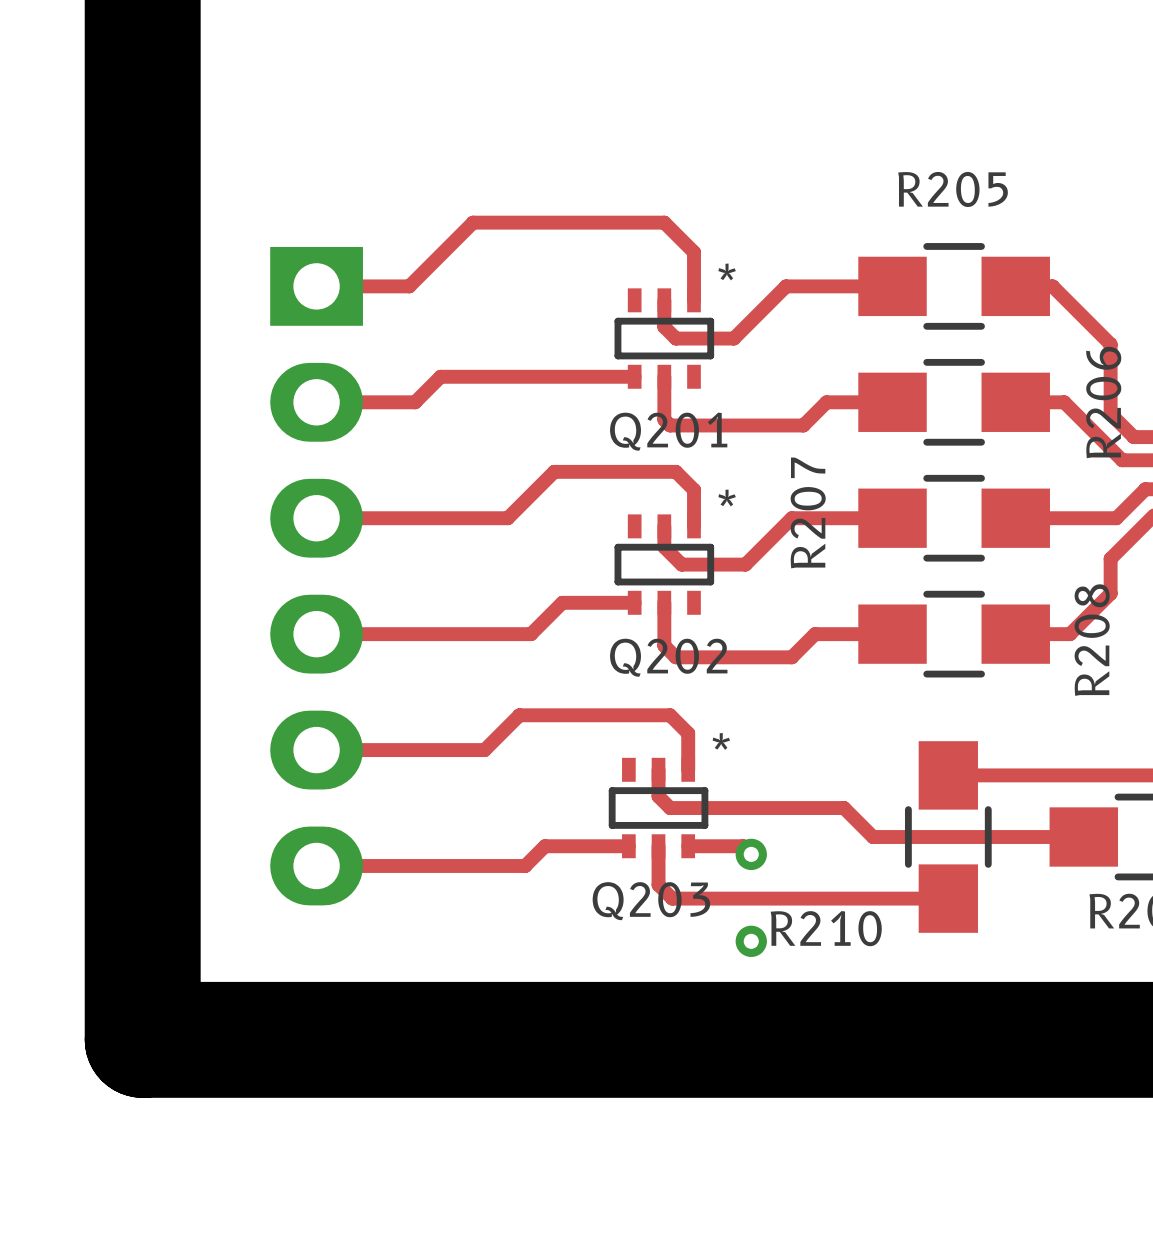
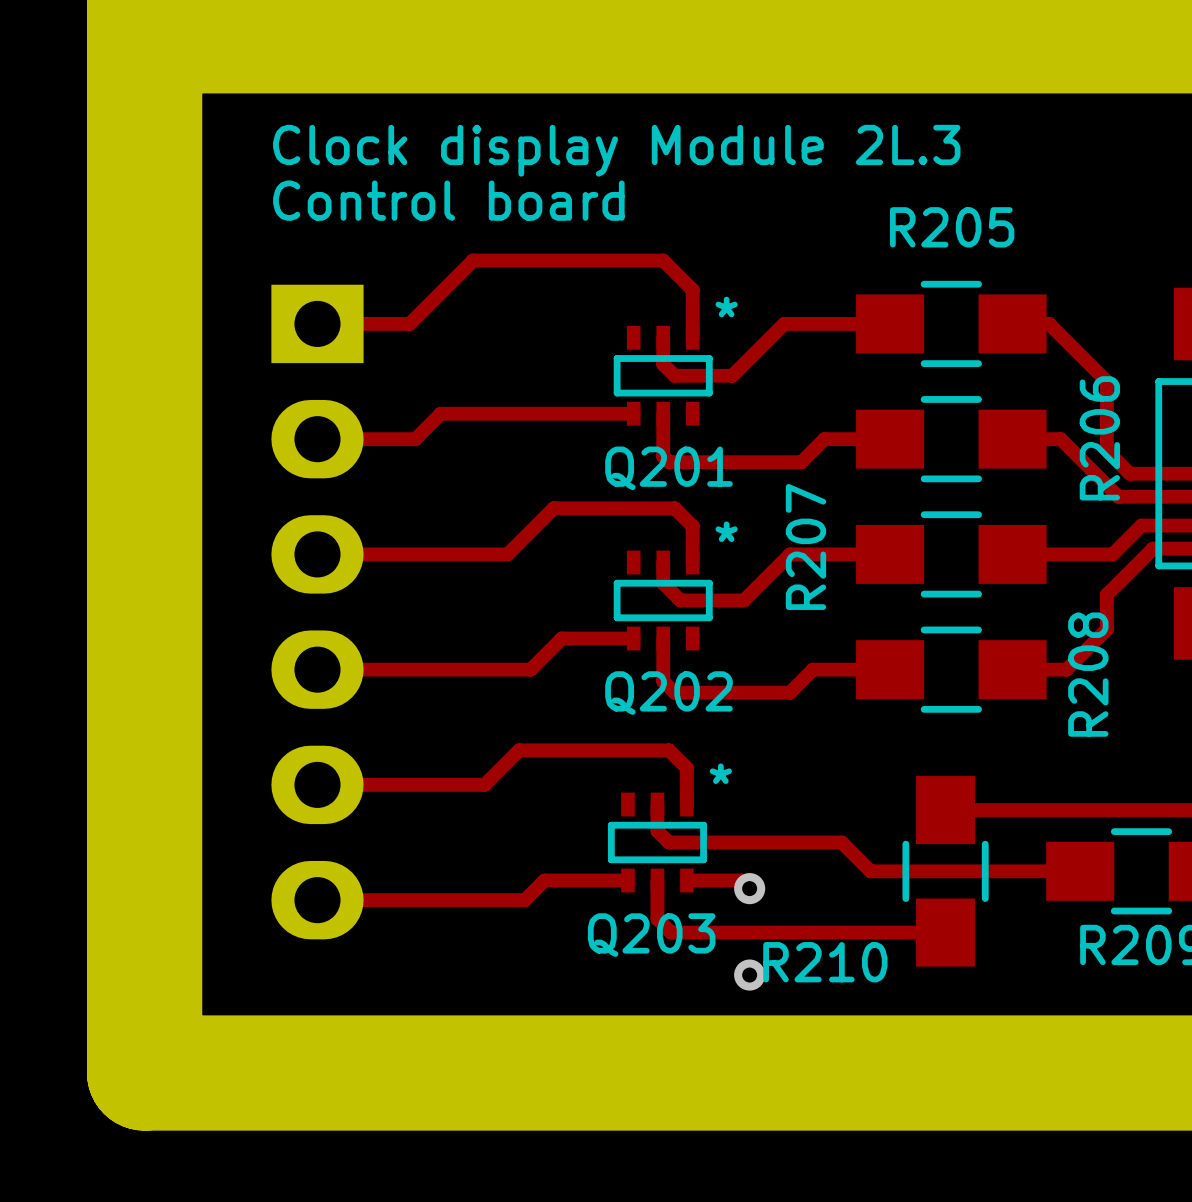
text: none -> Clock display Module 2L.3 (616, 150)
text: none -> Control board (448, 200)

